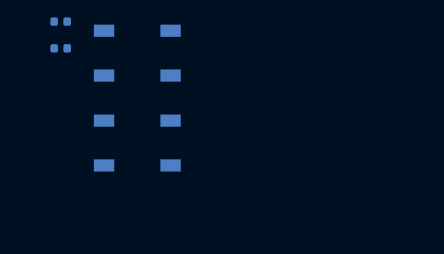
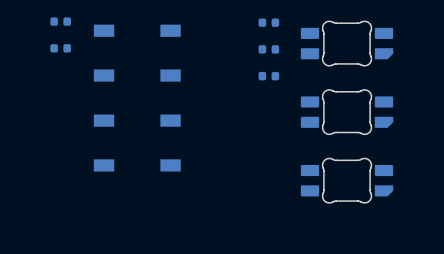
part: none -> (268, 22)
part: none -> (347, 43)
part: none -> (268, 49)
part: none -> (268, 76)
part: none -> (347, 112)
part: none -> (347, 180)

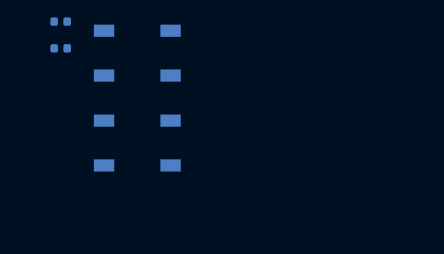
part: (268, 22) -> none
part: (347, 43) -> none
part: (268, 49) -> none
part: (268, 76) -> none
part: (347, 112) -> none
part: (347, 180) -> none

